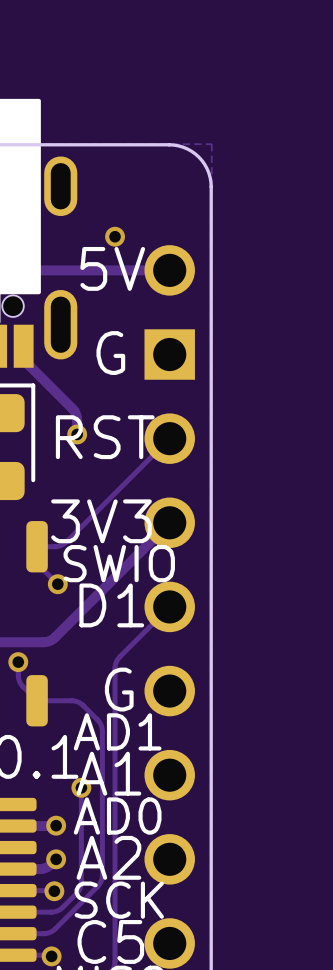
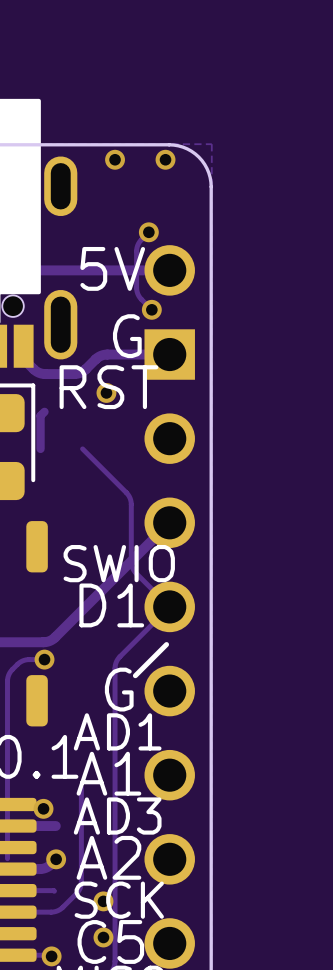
via: none -> (115, 159)
via: none -> (165, 159)
track: none -> (148, 232) (140, 240) (136, 248) (136, 287) (140, 297) (151, 309)
via position: (115, 236) -> (148, 232)
via: none -> (151, 309)
track: (23, 346) (23, 356) (27, 363) (74, 411) (77, 434) -> none
text position: G (110, 353) -> G (127, 336)
track: none -> (169, 354) (103, 355) (83, 371) (74, 374) (41, 373) (23, 359)
via: none -> (106, 392)
track: none -> (44, 411) (40, 415) (40, 448)
via: (77, 434) -> none
text position: RST (105, 437) -> RST (108, 387)
track: (169, 438) (65, 542) (56, 546) (37, 546) (39, 564) (57, 584) -> none
track: none -> (82, 448) (129, 496) (131, 504) (132, 567) (169, 606)
text: 3V3 (101, 521) -> none
via: (57, 584) -> none
line: none -> (166, 644) (135, 675)
track: none -> (44, 659) (21, 661) (10, 671) (7, 679) (7, 858)
via: none -> (44, 659)
track: (18, 662) (20, 682) (37, 700) (77, 702) (101, 725) (102, 874) (97, 886) (52, 930) (45, 933) (12, 933) -> none
via: (18, 662) -> none
via: (81, 787) -> none
text: AD0 (117, 816) -> AD3 (117, 816)
via position: (56, 825) -> (43, 808)
via: (54, 891) -> none
via: none -> (103, 901)
via: none -> (103, 937)

